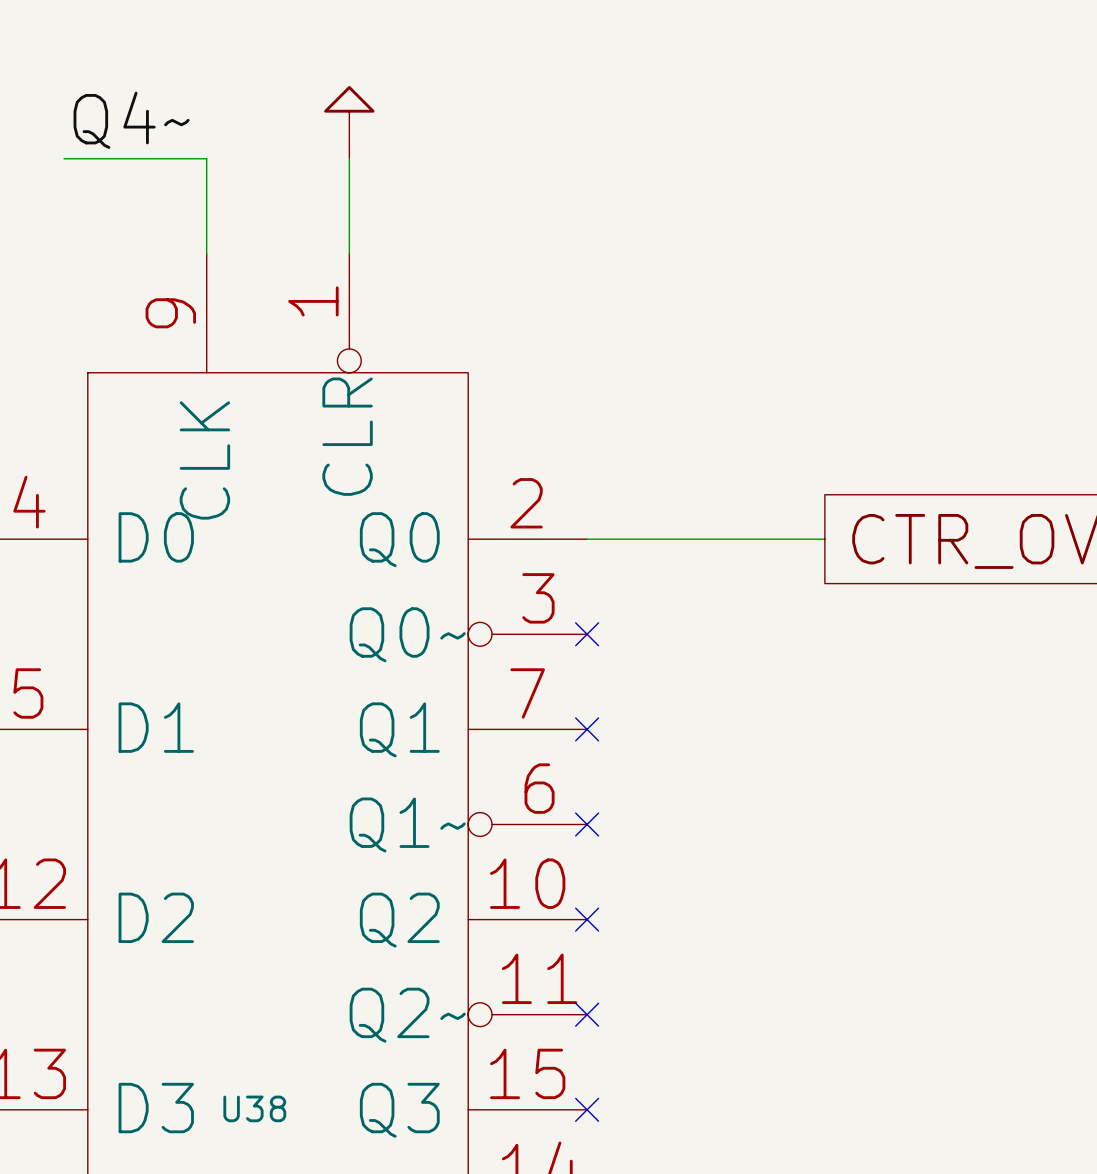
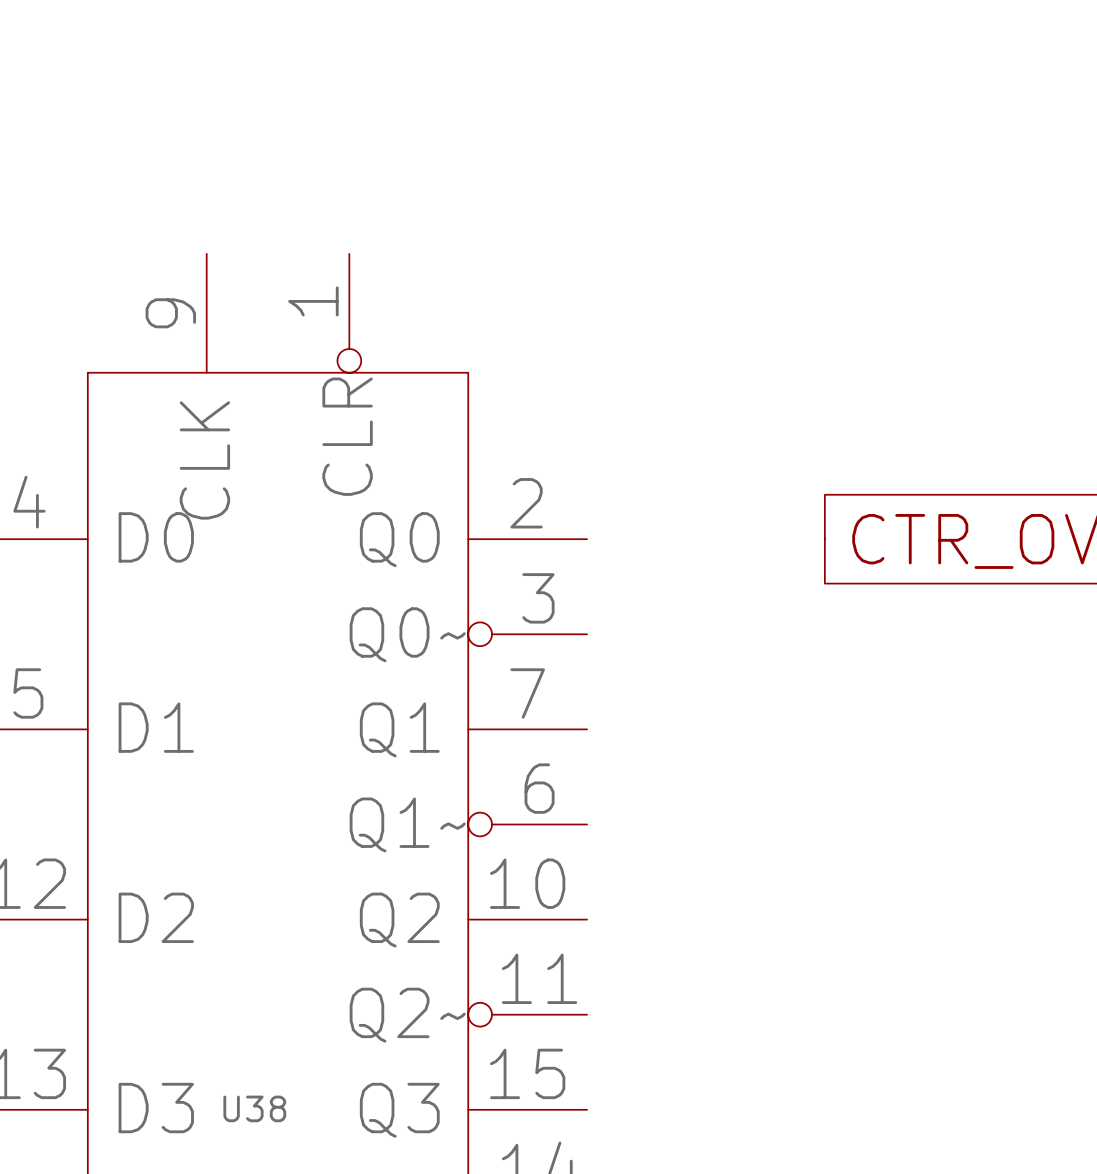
label: Q4~ (131, 120) -> none
power symbol: (349, 122) -> none
wire: (64, 158) (206, 158) (206, 253) -> none
wire: (349, 158) (349, 253) -> none
wire: (587, 539) (824, 539) -> none
no-connect mark: (587, 634) -> none
no-connect mark: (587, 729) -> none
no-connect mark: (587, 824) -> none
no-connect mark: (587, 919) -> none
no-connect mark: (587, 1014) -> none
no-connect mark: (587, 1109) -> none

